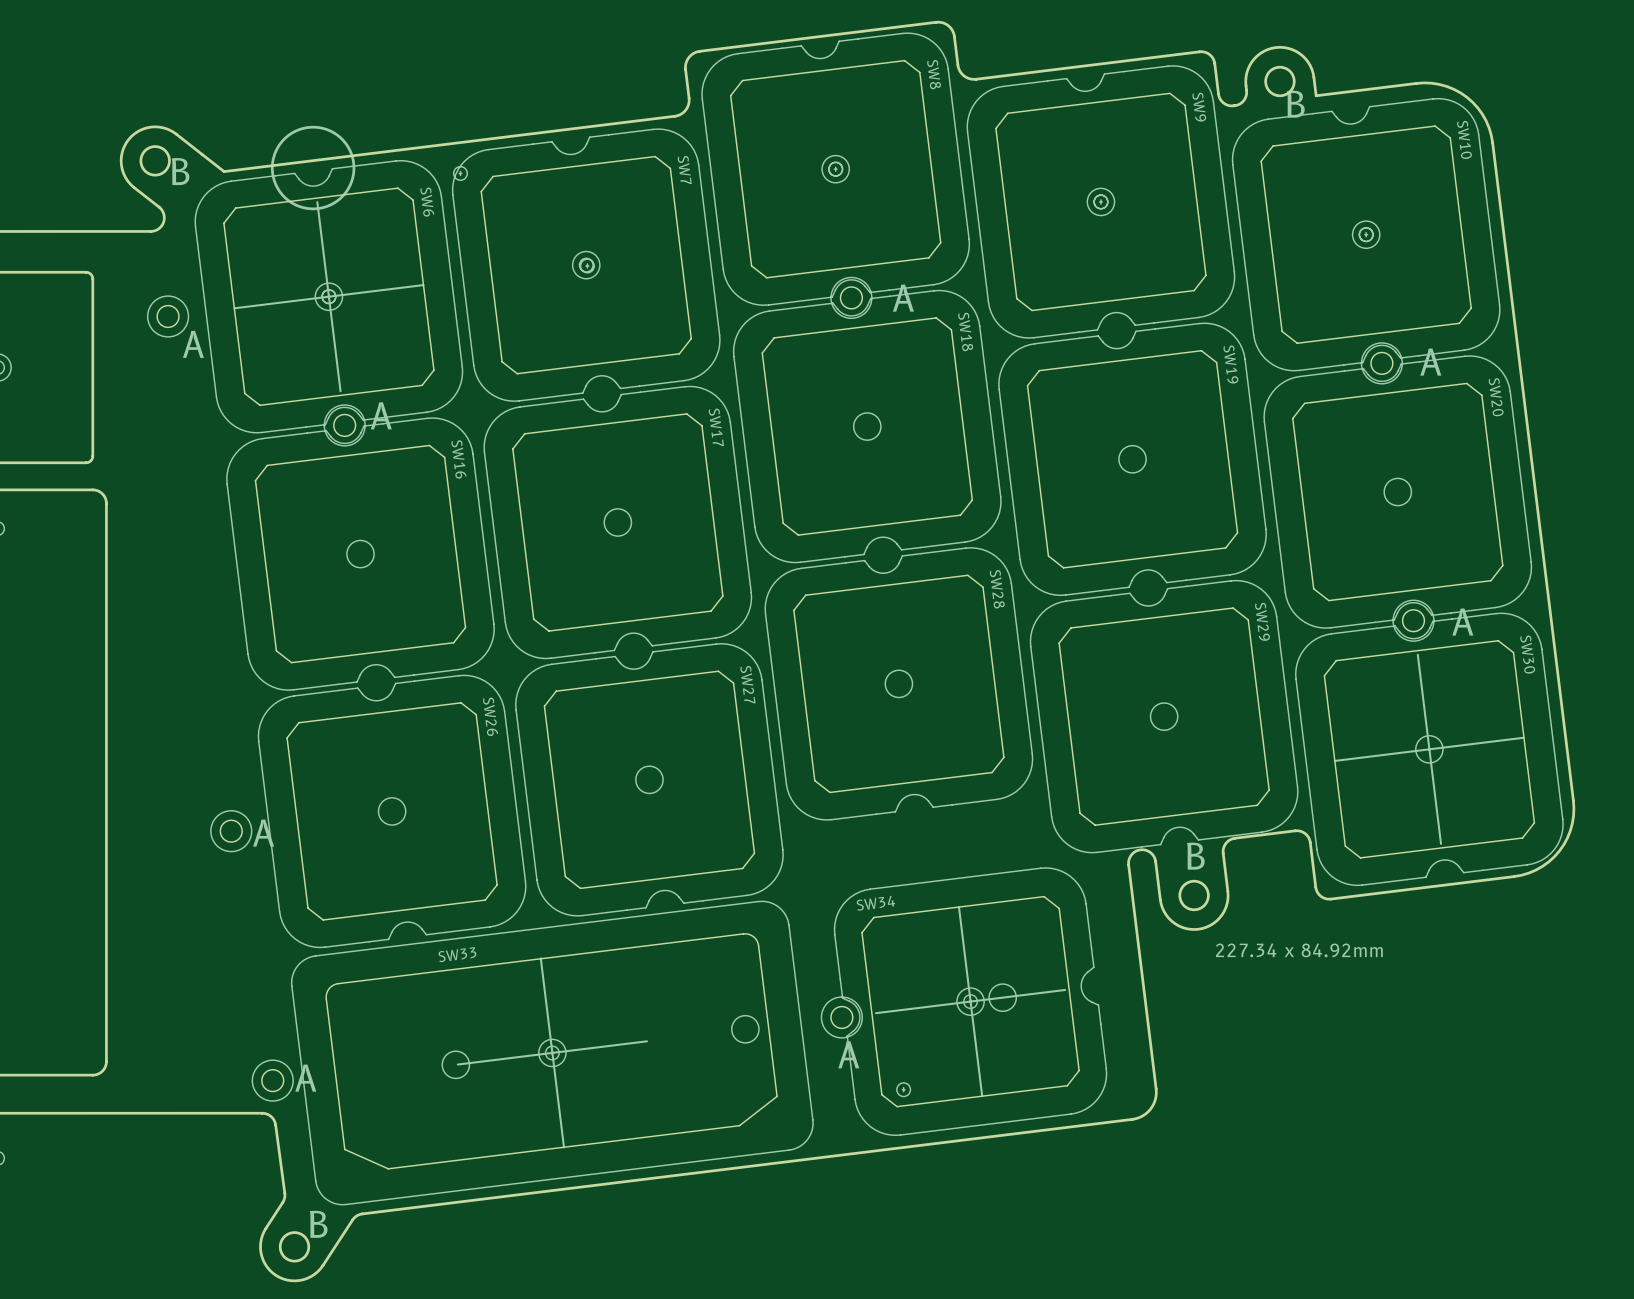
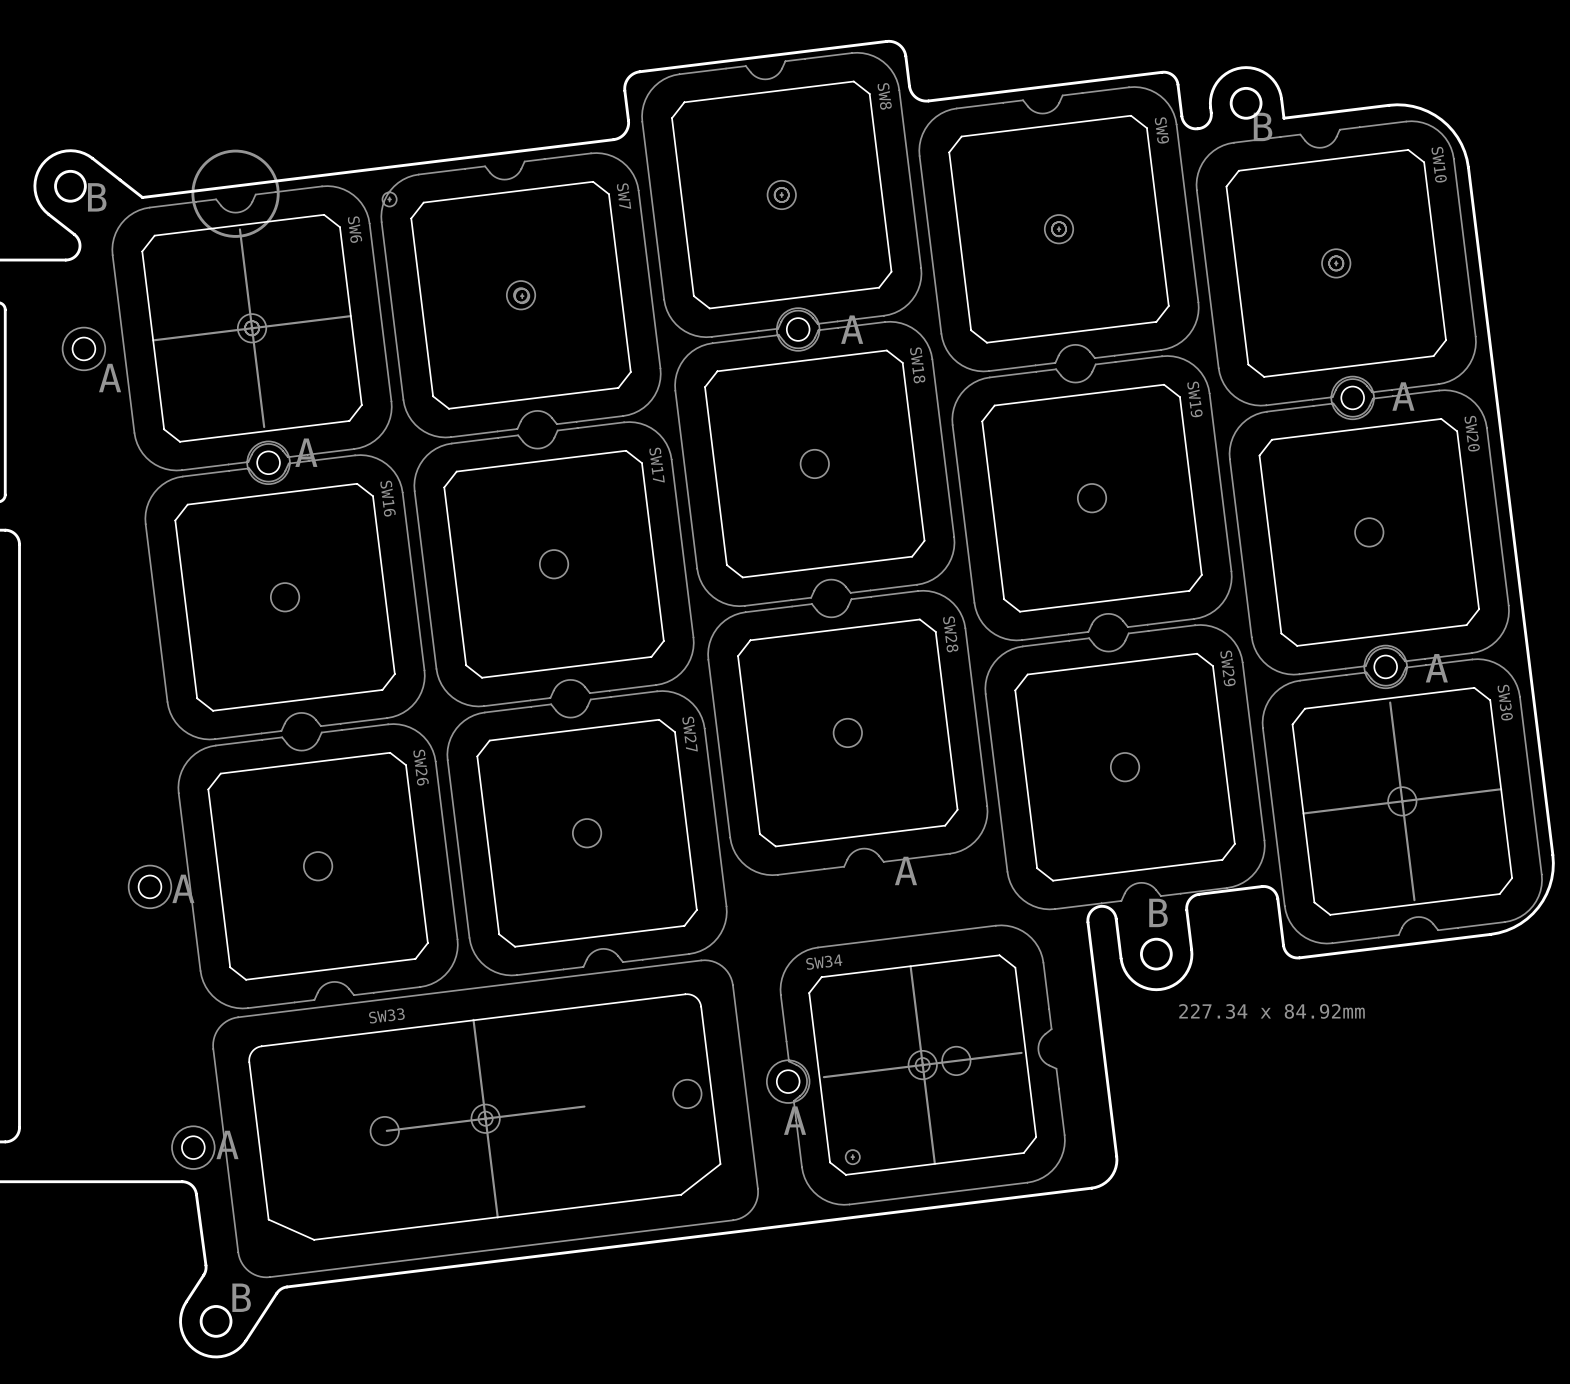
text: none -> A (906, 870)

